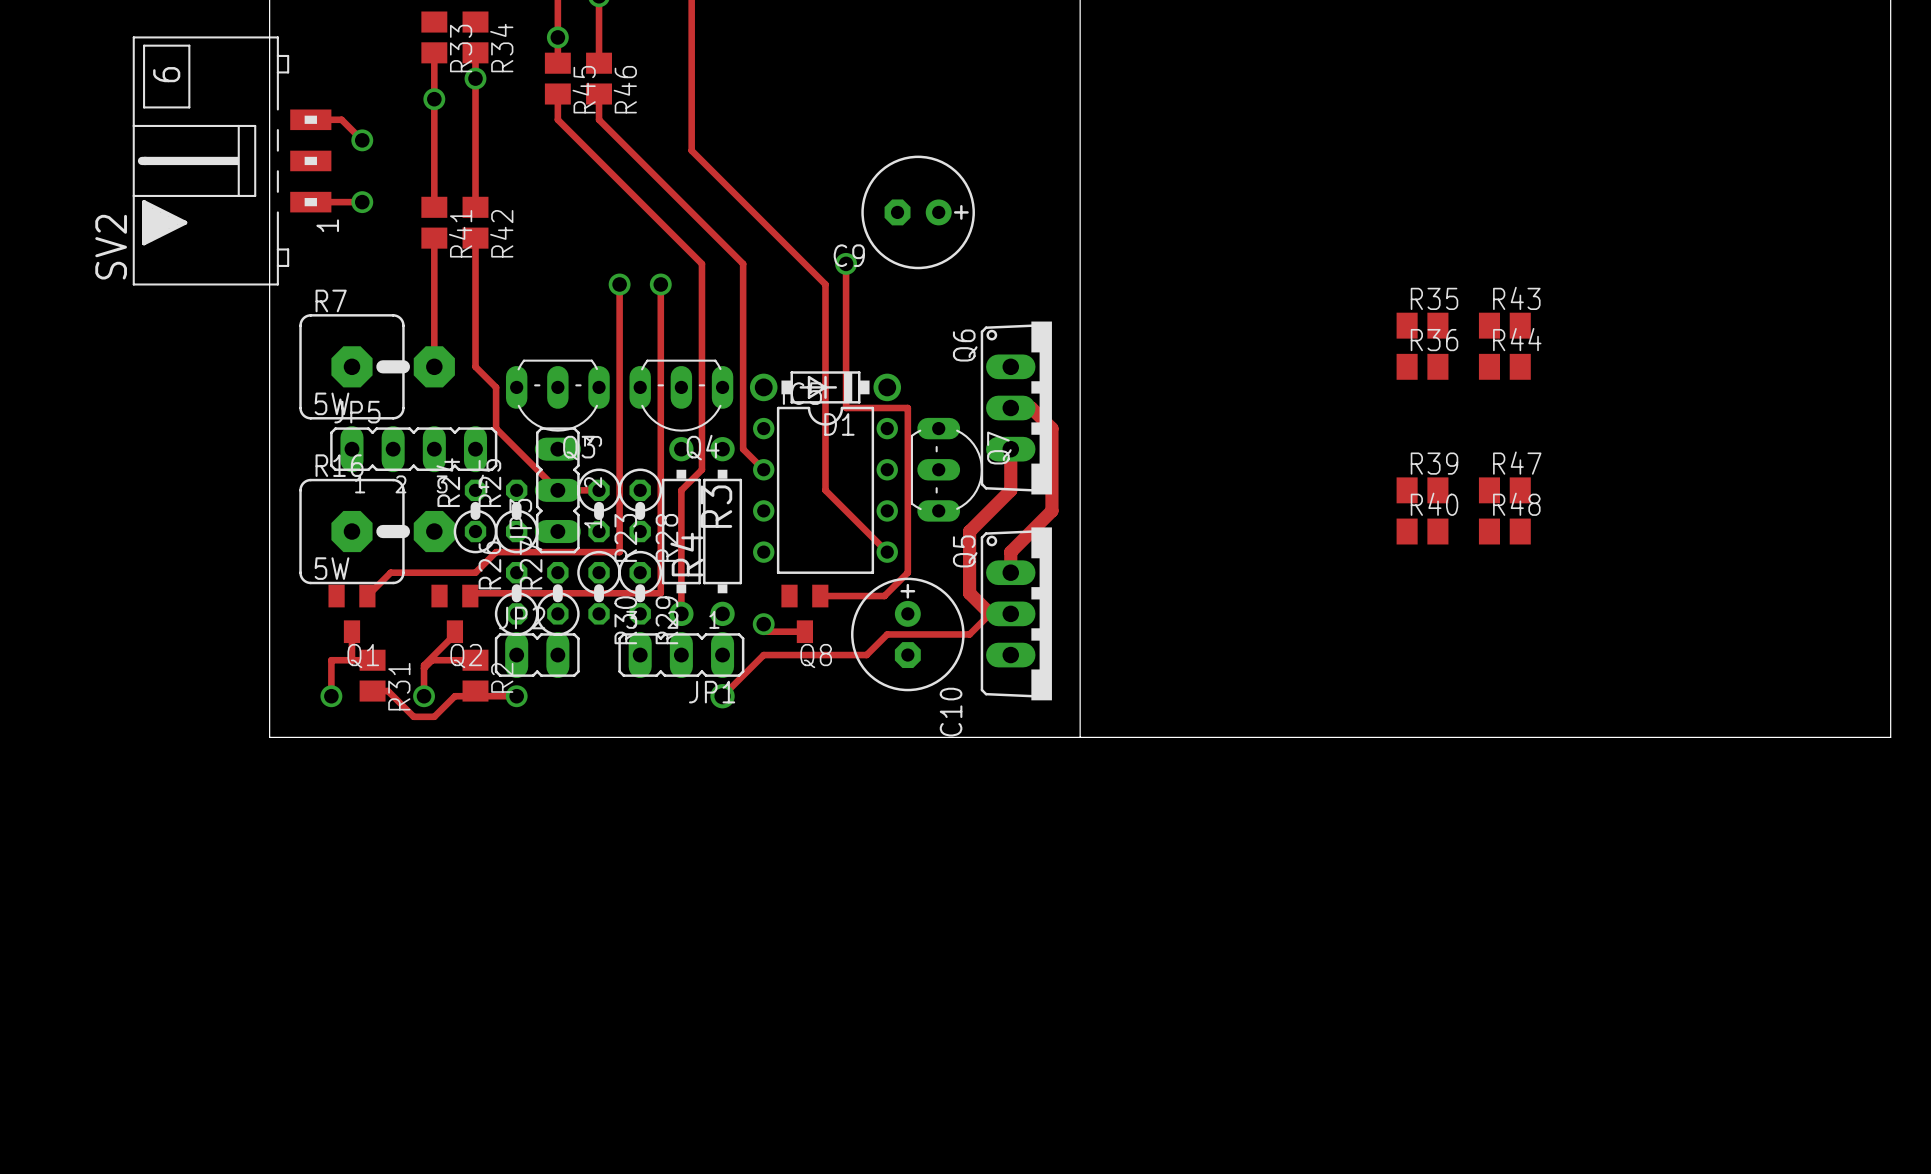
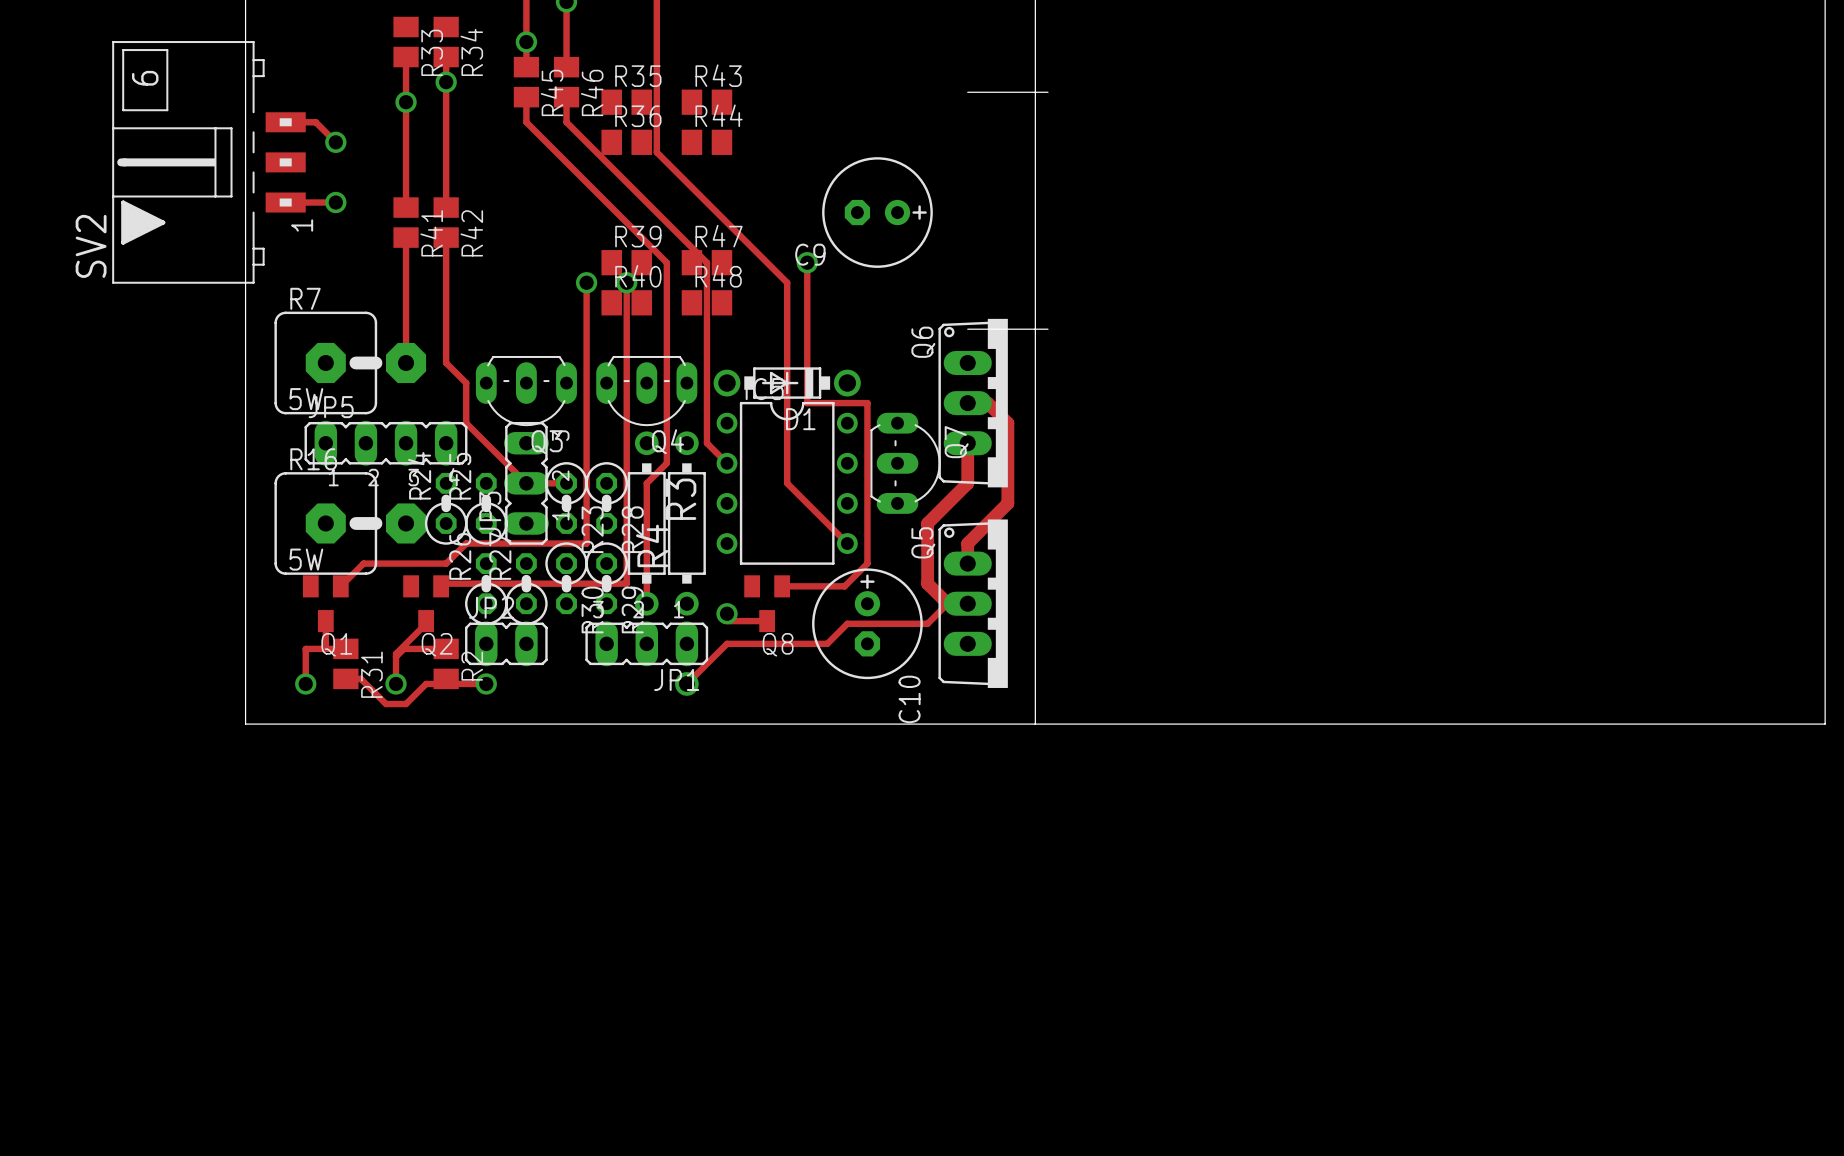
board edge: none -> (967, 92) (1047, 92)
R35 position: (1422, 325) -> (626, 102)
R43 position: (1504, 325) -> (706, 102)
board edge: none -> (967, 329) (1047, 329)
R36 position: (1422, 366) -> (626, 142)
R44 position: (1504, 366) -> (706, 142)
R39 position: (1422, 490) -> (626, 262)
R47 position: (1504, 490) -> (706, 262)
R40 position: (1422, 531) -> (626, 302)
R48 position: (1504, 531) -> (706, 302)

